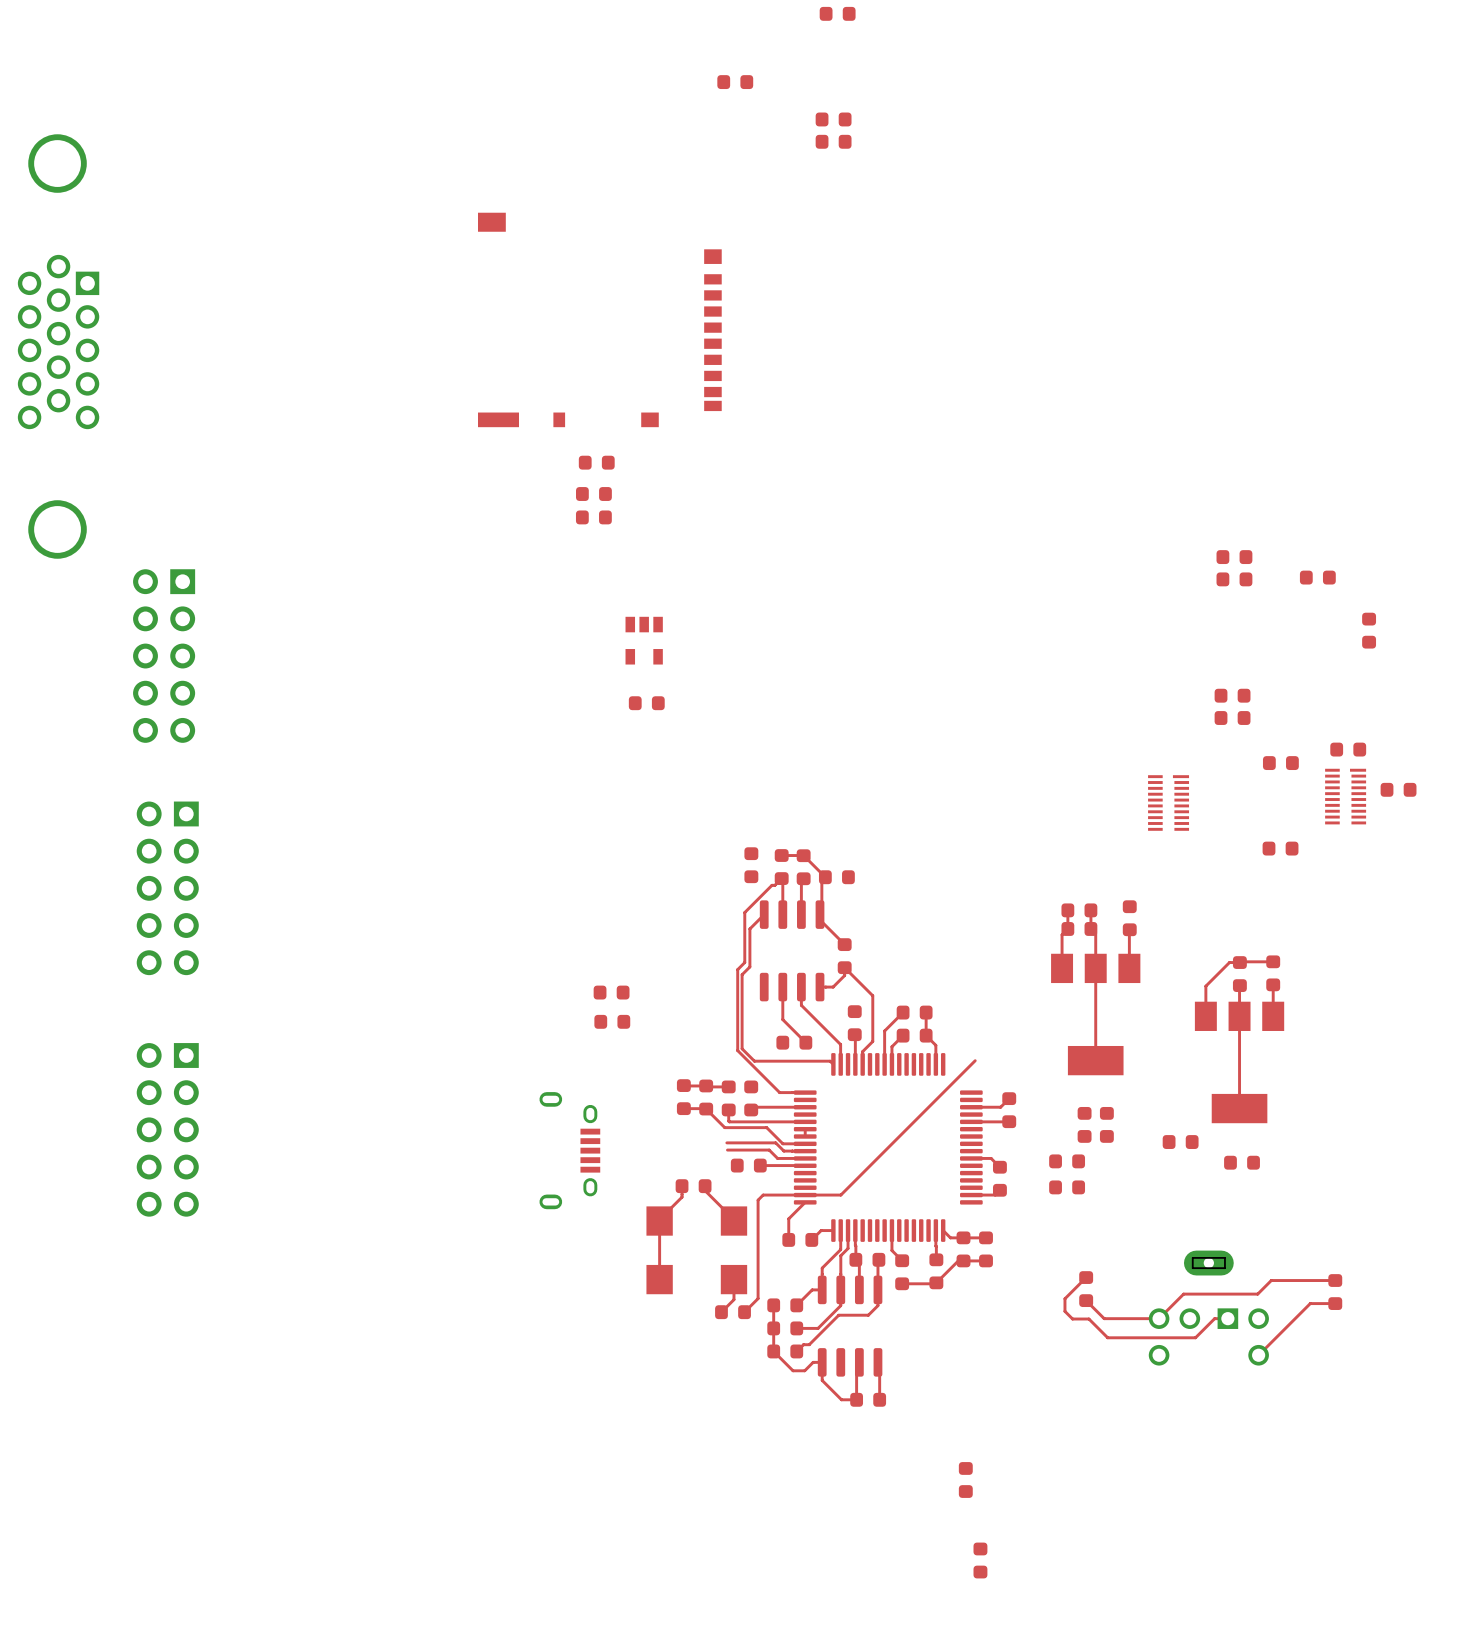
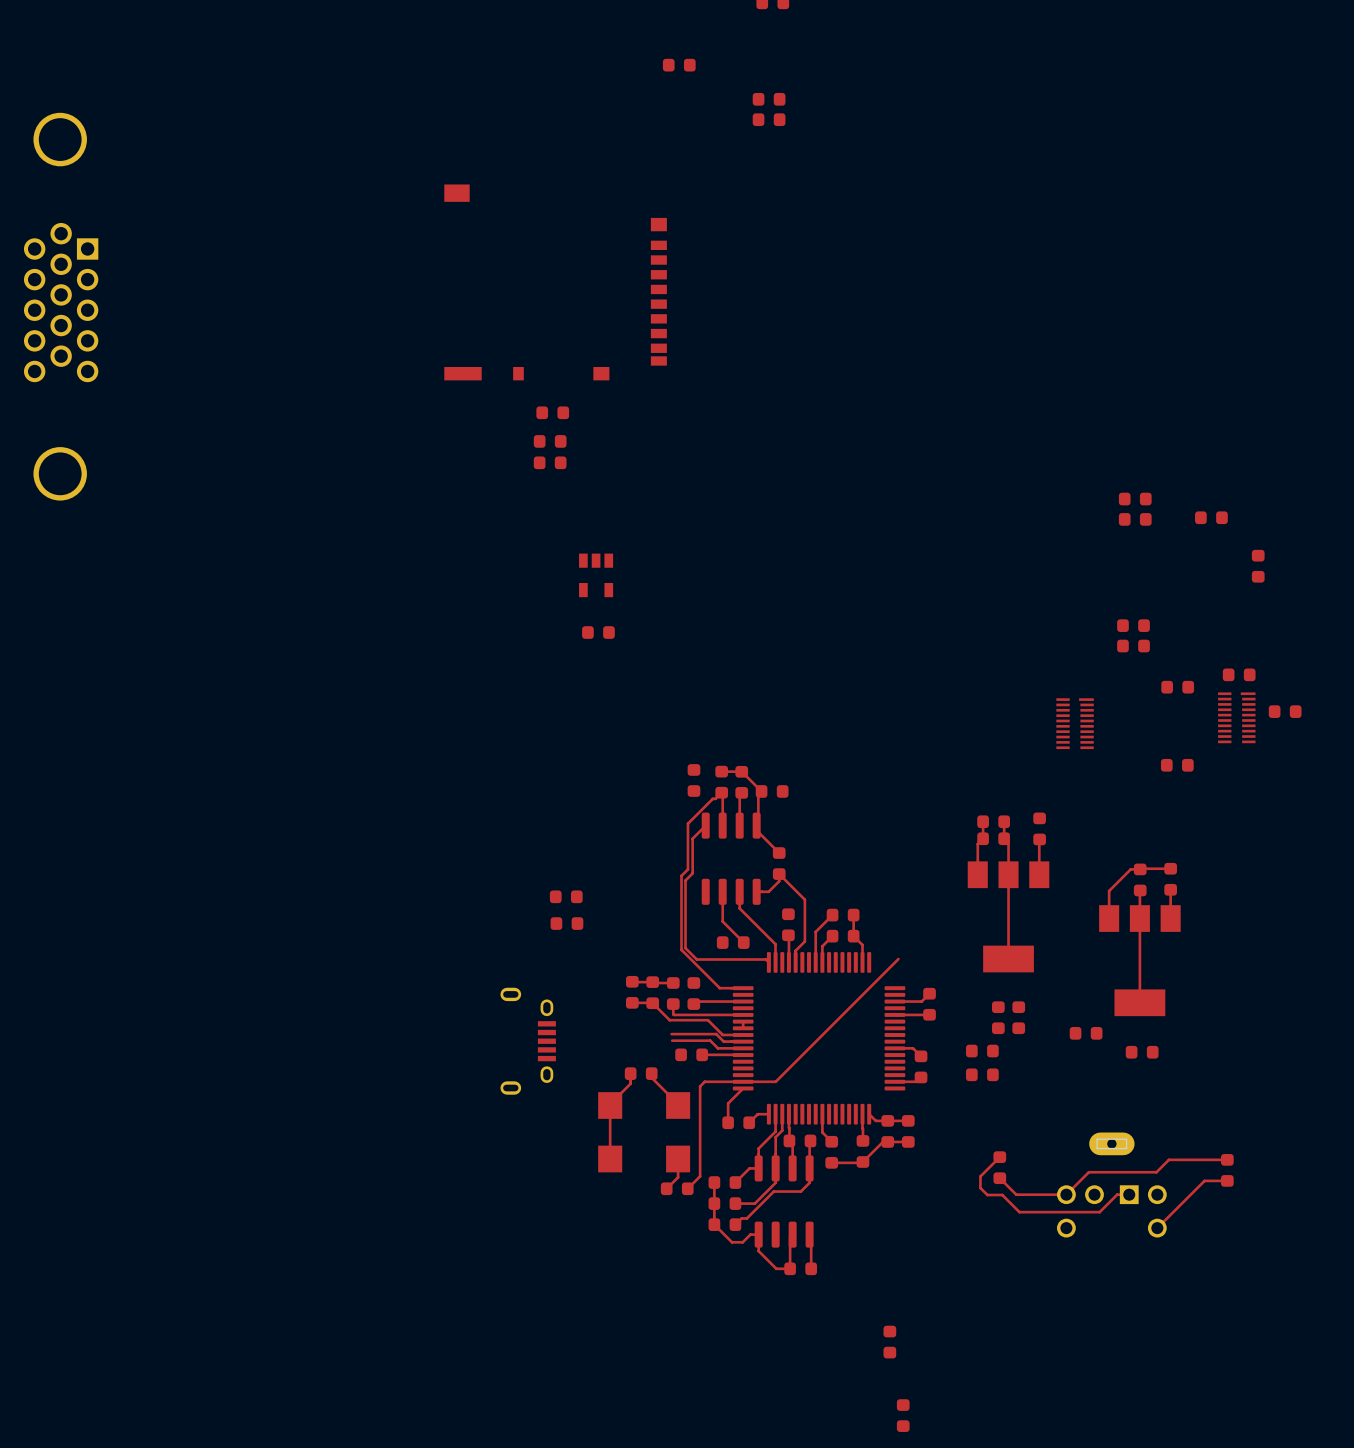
part: (164, 656) -> none
part: (167, 888) -> none
part: (167, 1129) -> none

